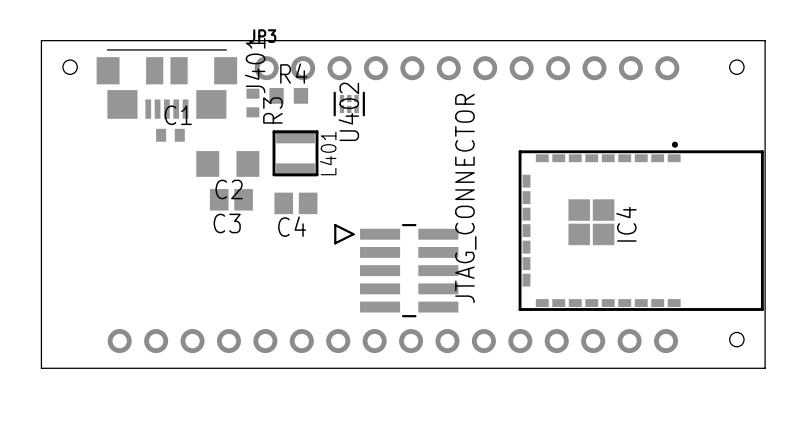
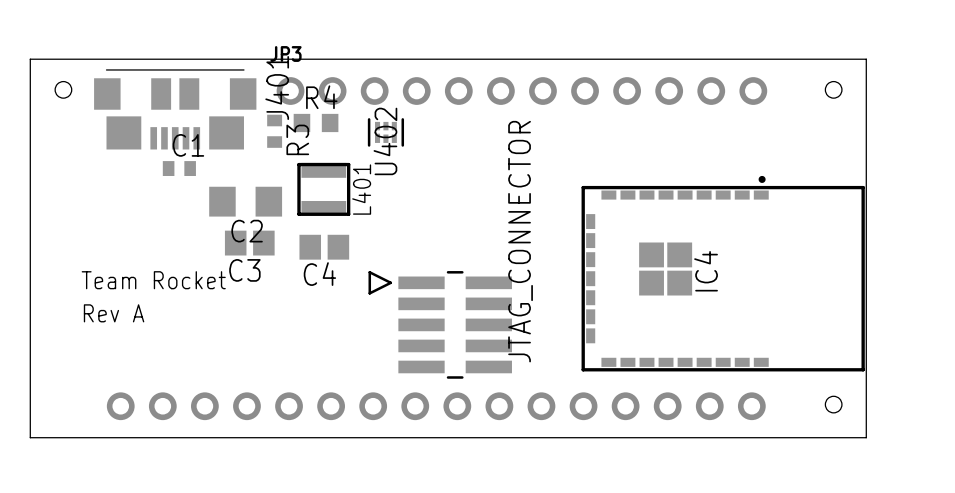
text: none -> Team Rocket (153, 280)
text: none -> Rev A (114, 313)

